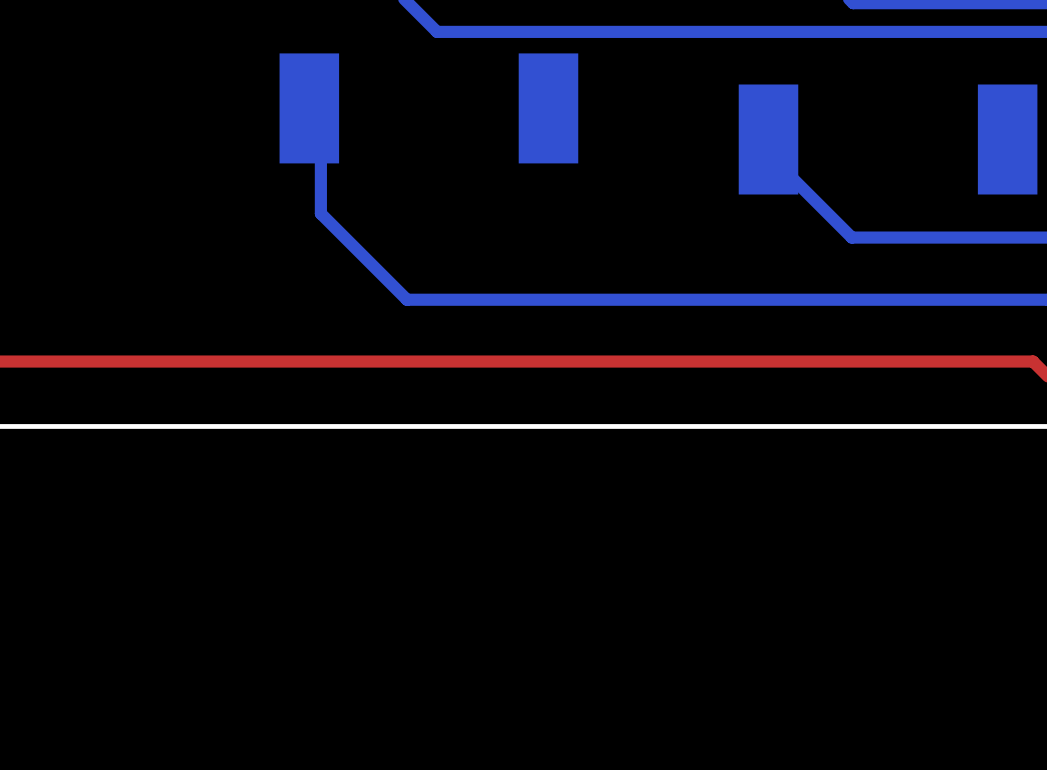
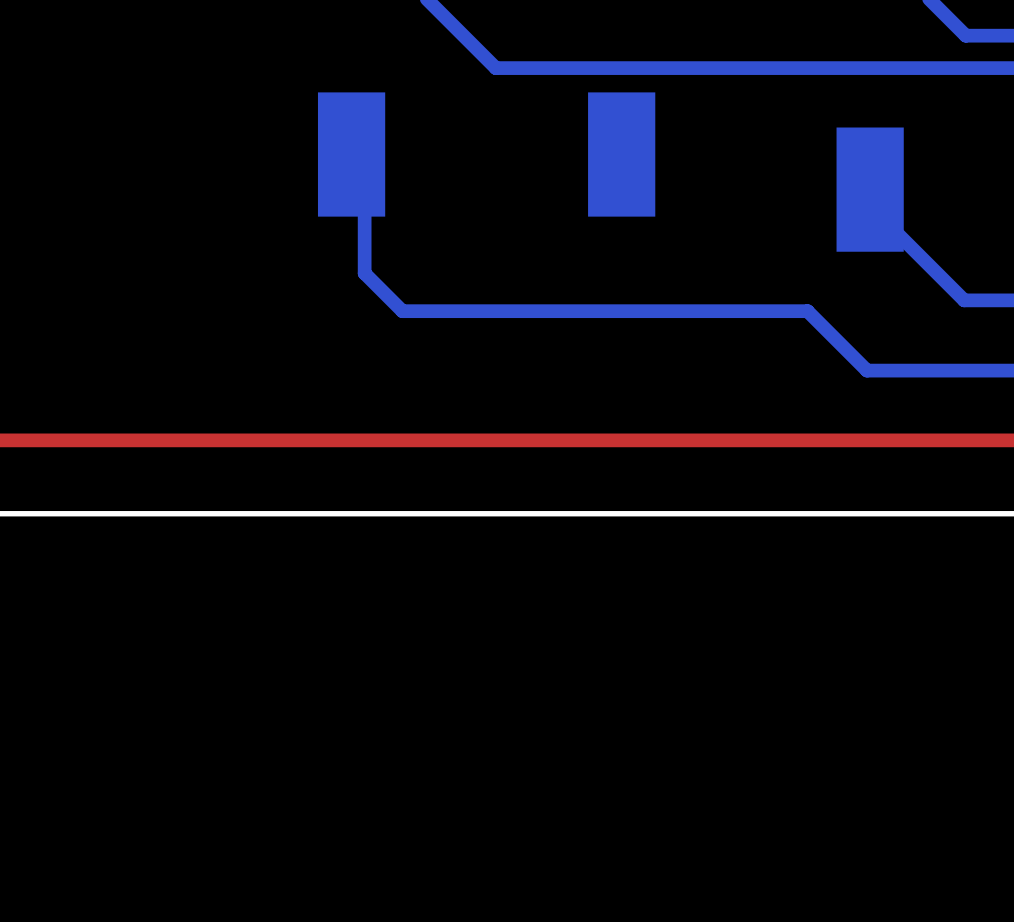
bottom track: (354, 247) (406, 299) (765, 299) -> (402, 311) (807, 311) (867, 370)

